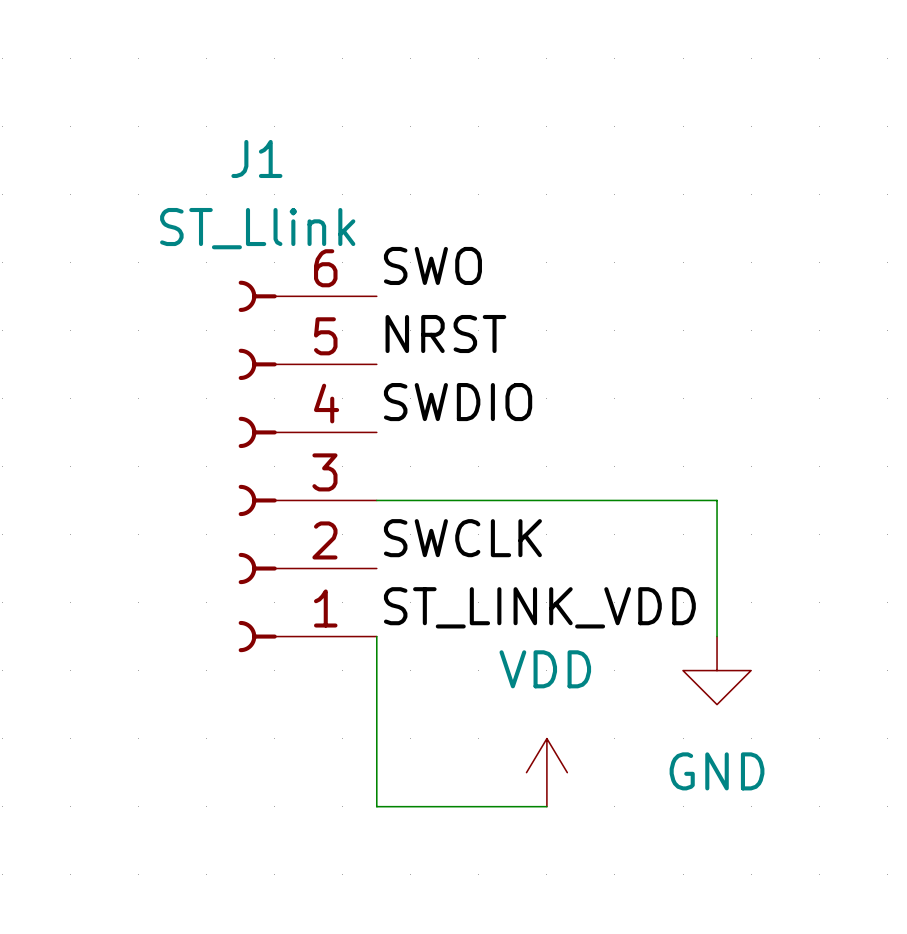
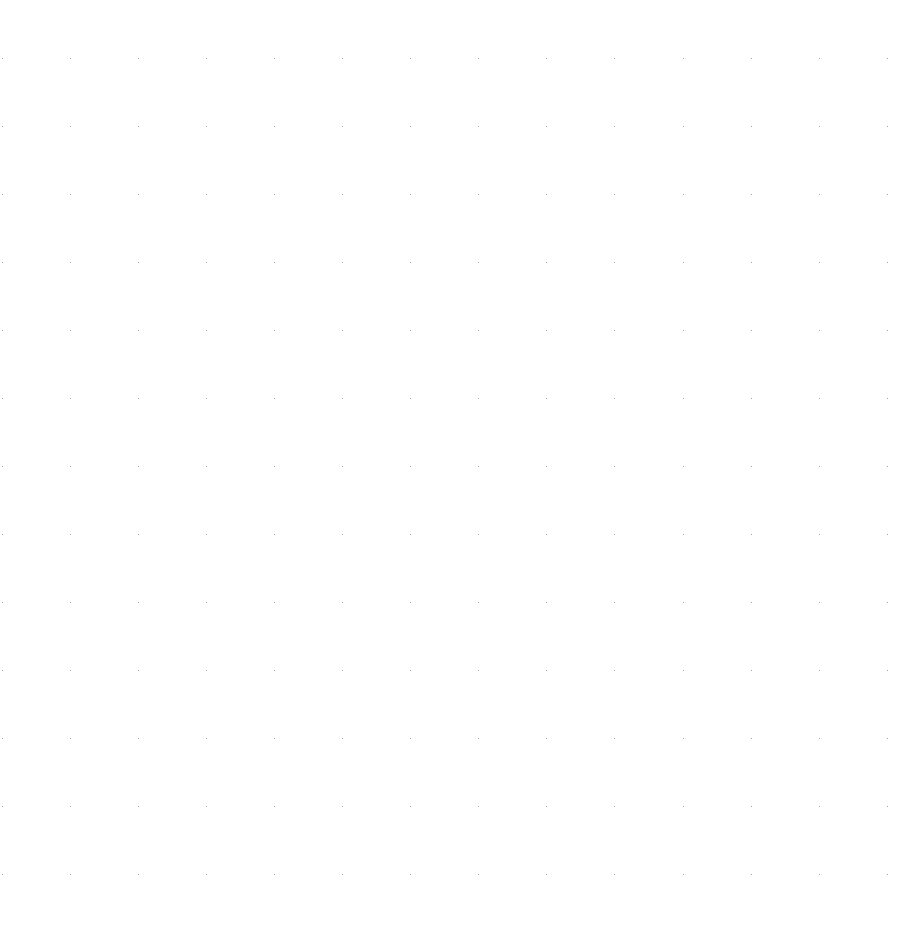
label: SWO (432, 265) -> none
label: NRST (445, 334) -> none
label: SWDIO (458, 402) -> none
J1: ST_Llink (307, 466) -> none
wire: (376, 500) (717, 500) (717, 636) -> none
label: SWCLK (462, 538) -> none
label: ST_LINK_VDD (539, 607) -> none
wire: (376, 636) (376, 806) (546, 806) -> none
power symbol: GND (717, 670) -> none
power symbol: VDD (546, 772) -> none

